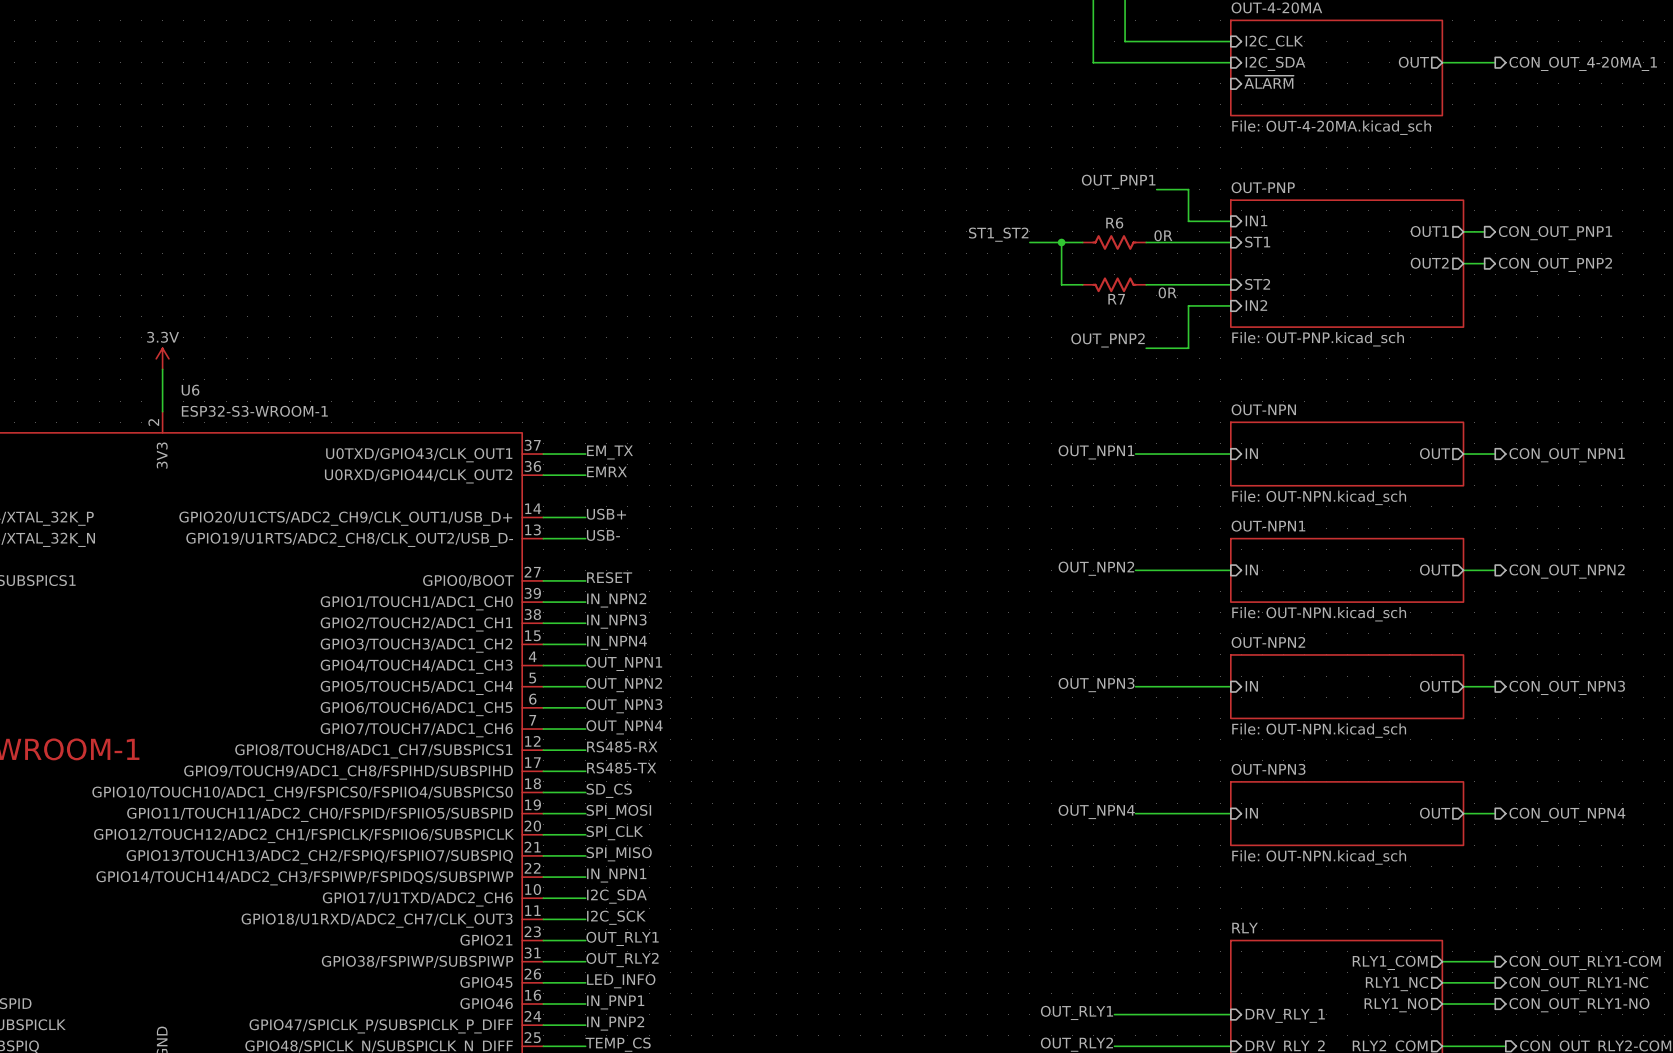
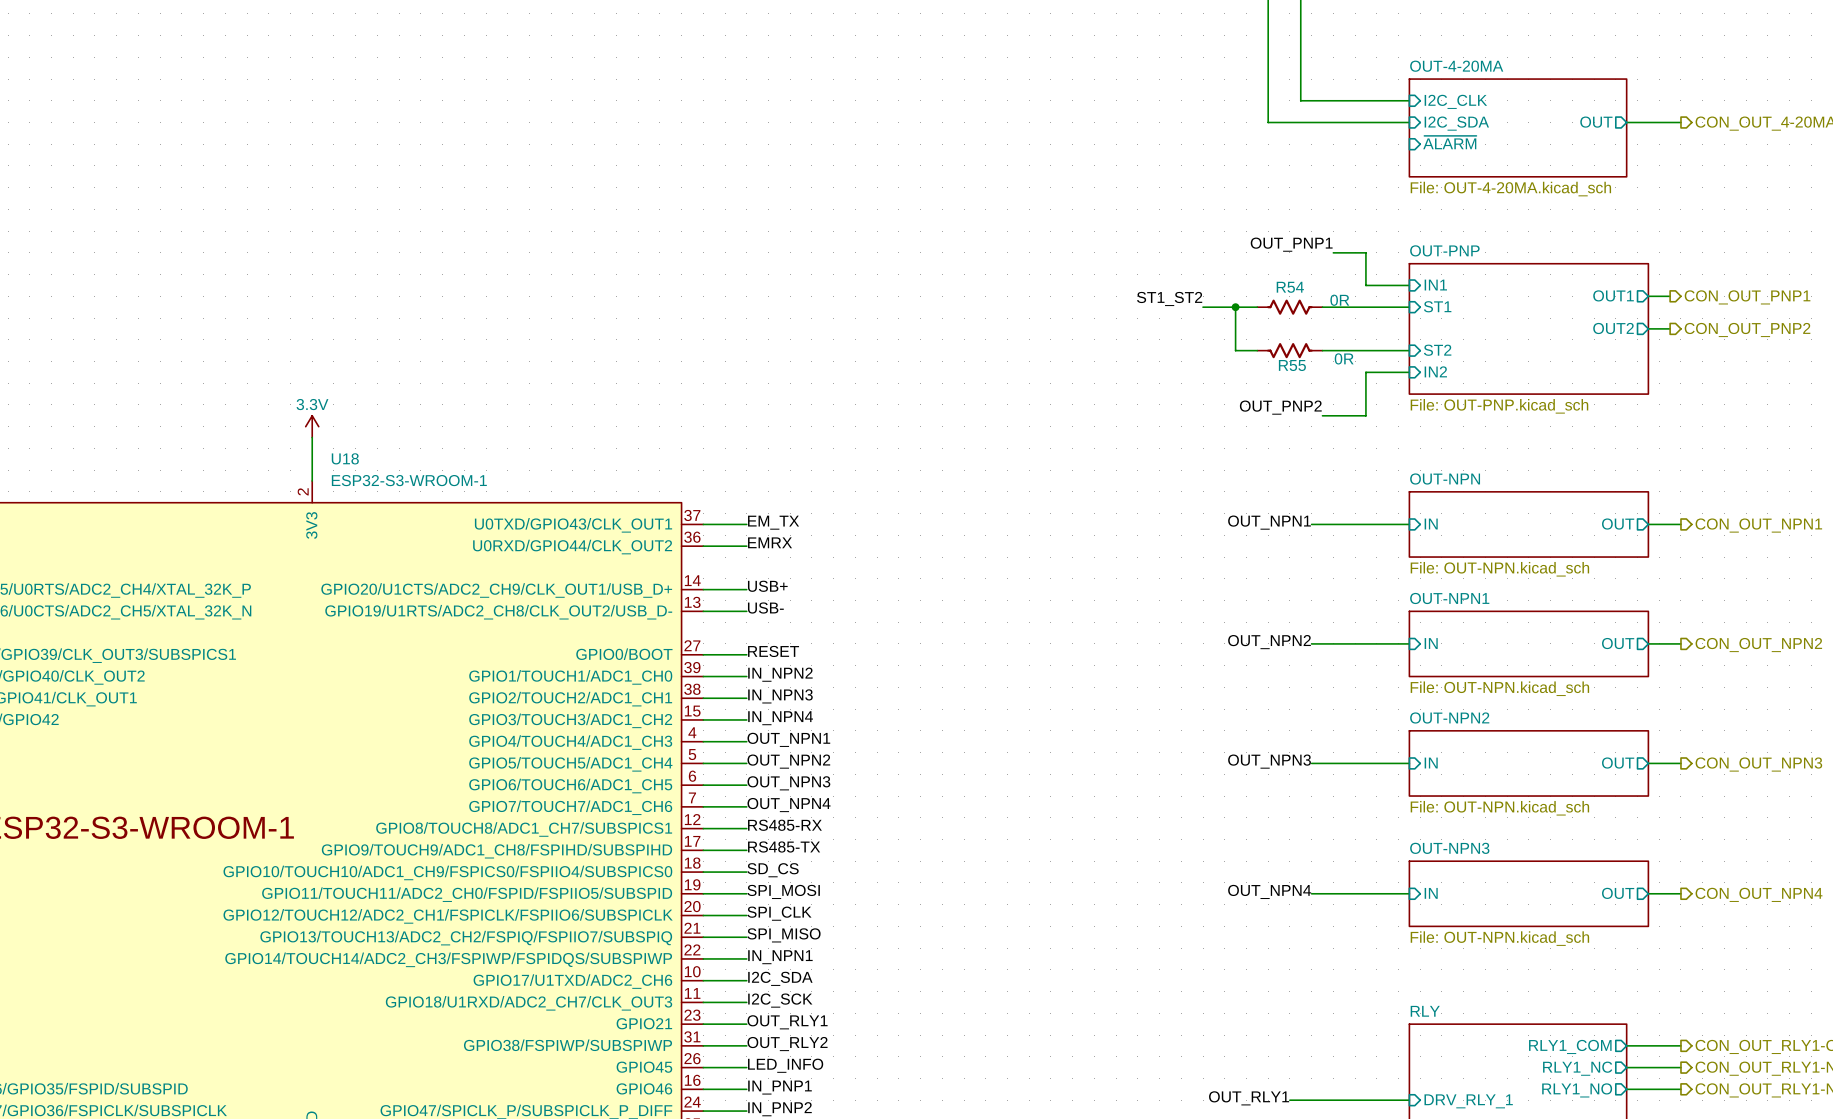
R6 name: R6 (1114, 223) -> R54 (1290, 287)
R7 name: R7 (1116, 299) -> R55 (1292, 365)
U6 name: U6 (190, 390) -> U18 (345, 458)

